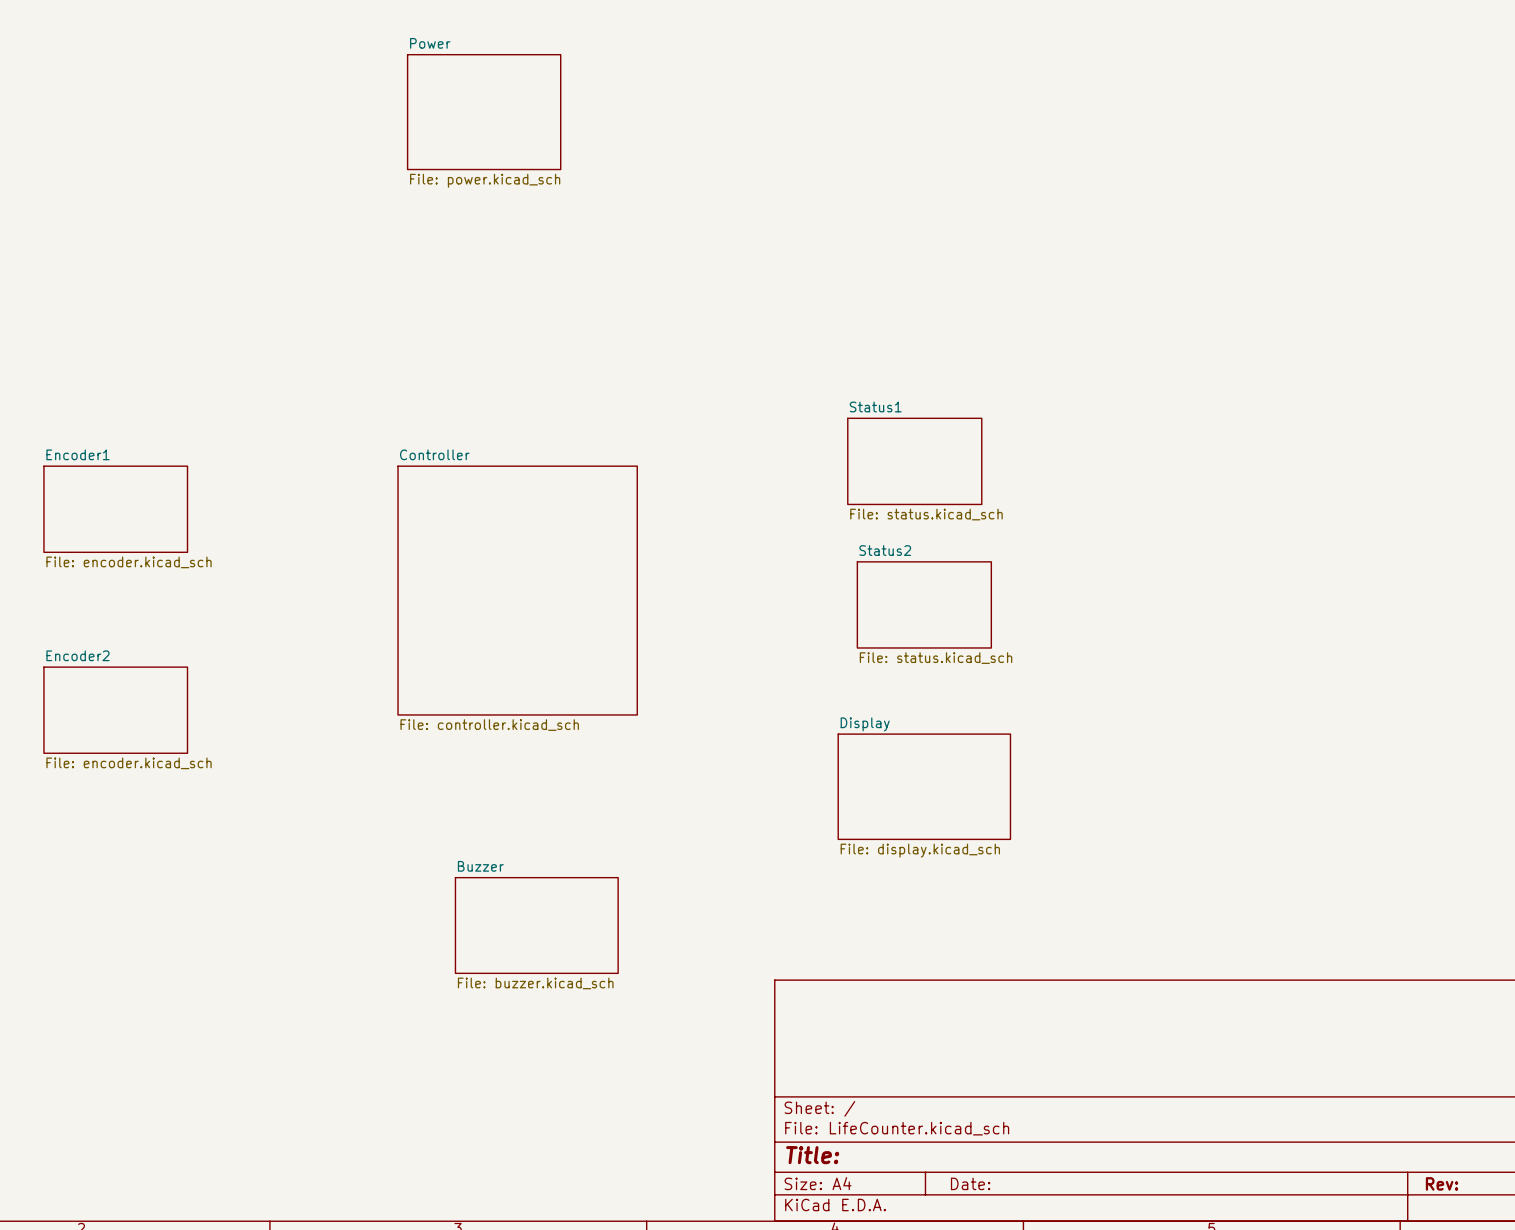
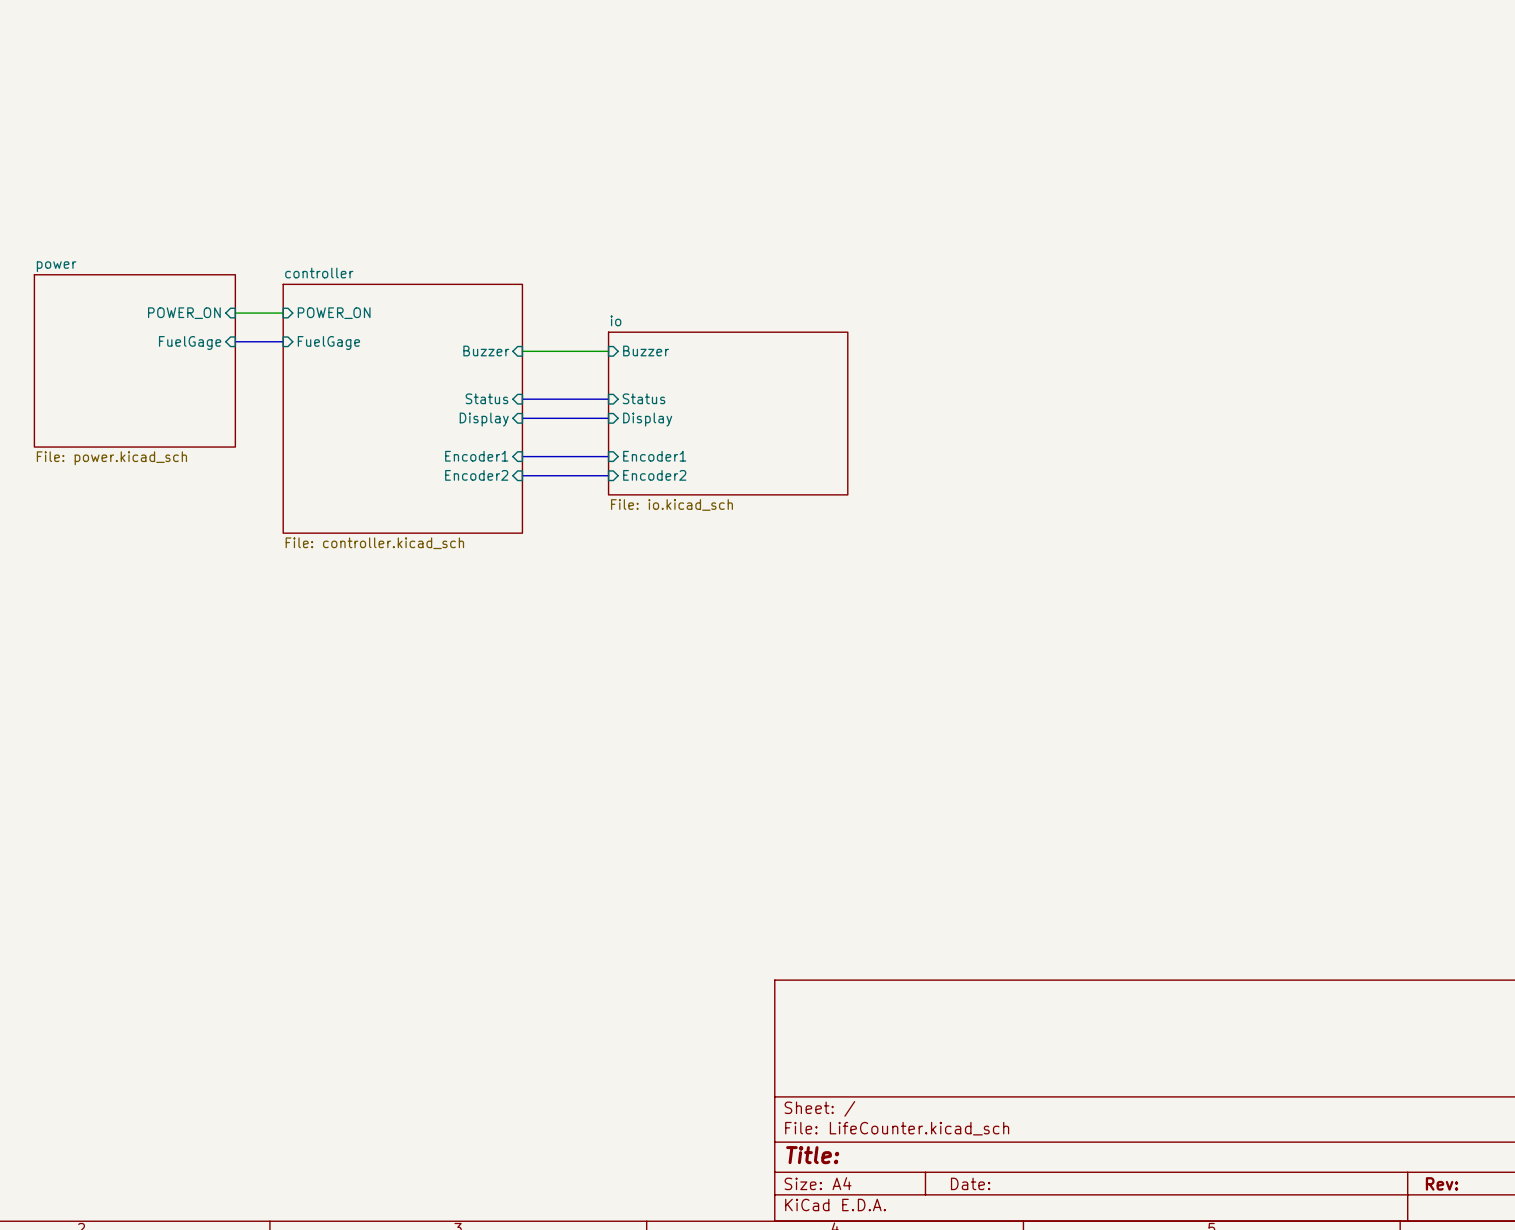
sheet Power: File: power.kicad_sch (484, 112) -> none
sheet pin: none -> POWER_ON (184, 313)
wire: none -> (235, 313) (283, 313)
sheet pin: none -> POWER_ON (334, 313)
bus: none -> (235, 341) (283, 341)
sheet pin: none -> FuelGage (190, 343)
sheet pin: none -> FuelGage (328, 343)
sheet pin: none -> Buzzer (486, 350)
sheet pin: none -> Buzzer (646, 350)
wire: none -> (522, 351) (608, 351)
sheet power: none -> File: power.kicad_sch (134, 360)
sheet pin: none -> Status (486, 398)
sheet pin: none -> Status (644, 398)
bus: none -> (522, 399) (608, 399)
sheet controller: none -> File: controller.kicad_sch (402, 408)
sheet io: none -> File: io.kicad_sch (728, 413)
bus: none -> (522, 418) (608, 418)
sheet pin: none -> Display (484, 419)
sheet pin: none -> Display (647, 419)
sheet pin: none -> Encoder1 (476, 456)
bus: none -> (522, 456) (608, 456)
sheet pin: none -> Encoder1 (654, 456)
sheet Status1: File: status.kicad_sch (914, 461) -> none
sheet pin: none -> Encoder2 (476, 475)
bus: none -> (522, 475) (608, 475)
sheet pin: none -> Encoder2 (654, 475)
sheet Encoder1: File: encoder.kicad_sch (115, 509) -> none
sheet Controller: File: controller.kicad_sch (517, 590) -> none
sheet Status2: File: status.kicad_sch (924, 604) -> none
sheet Encoder2: File: encoder.kicad_sch (115, 710) -> none
sheet Display: File: display.kicad_sch (924, 786) -> none
sheet Buzzer: File: buzzer.kicad_sch (536, 925) -> none

